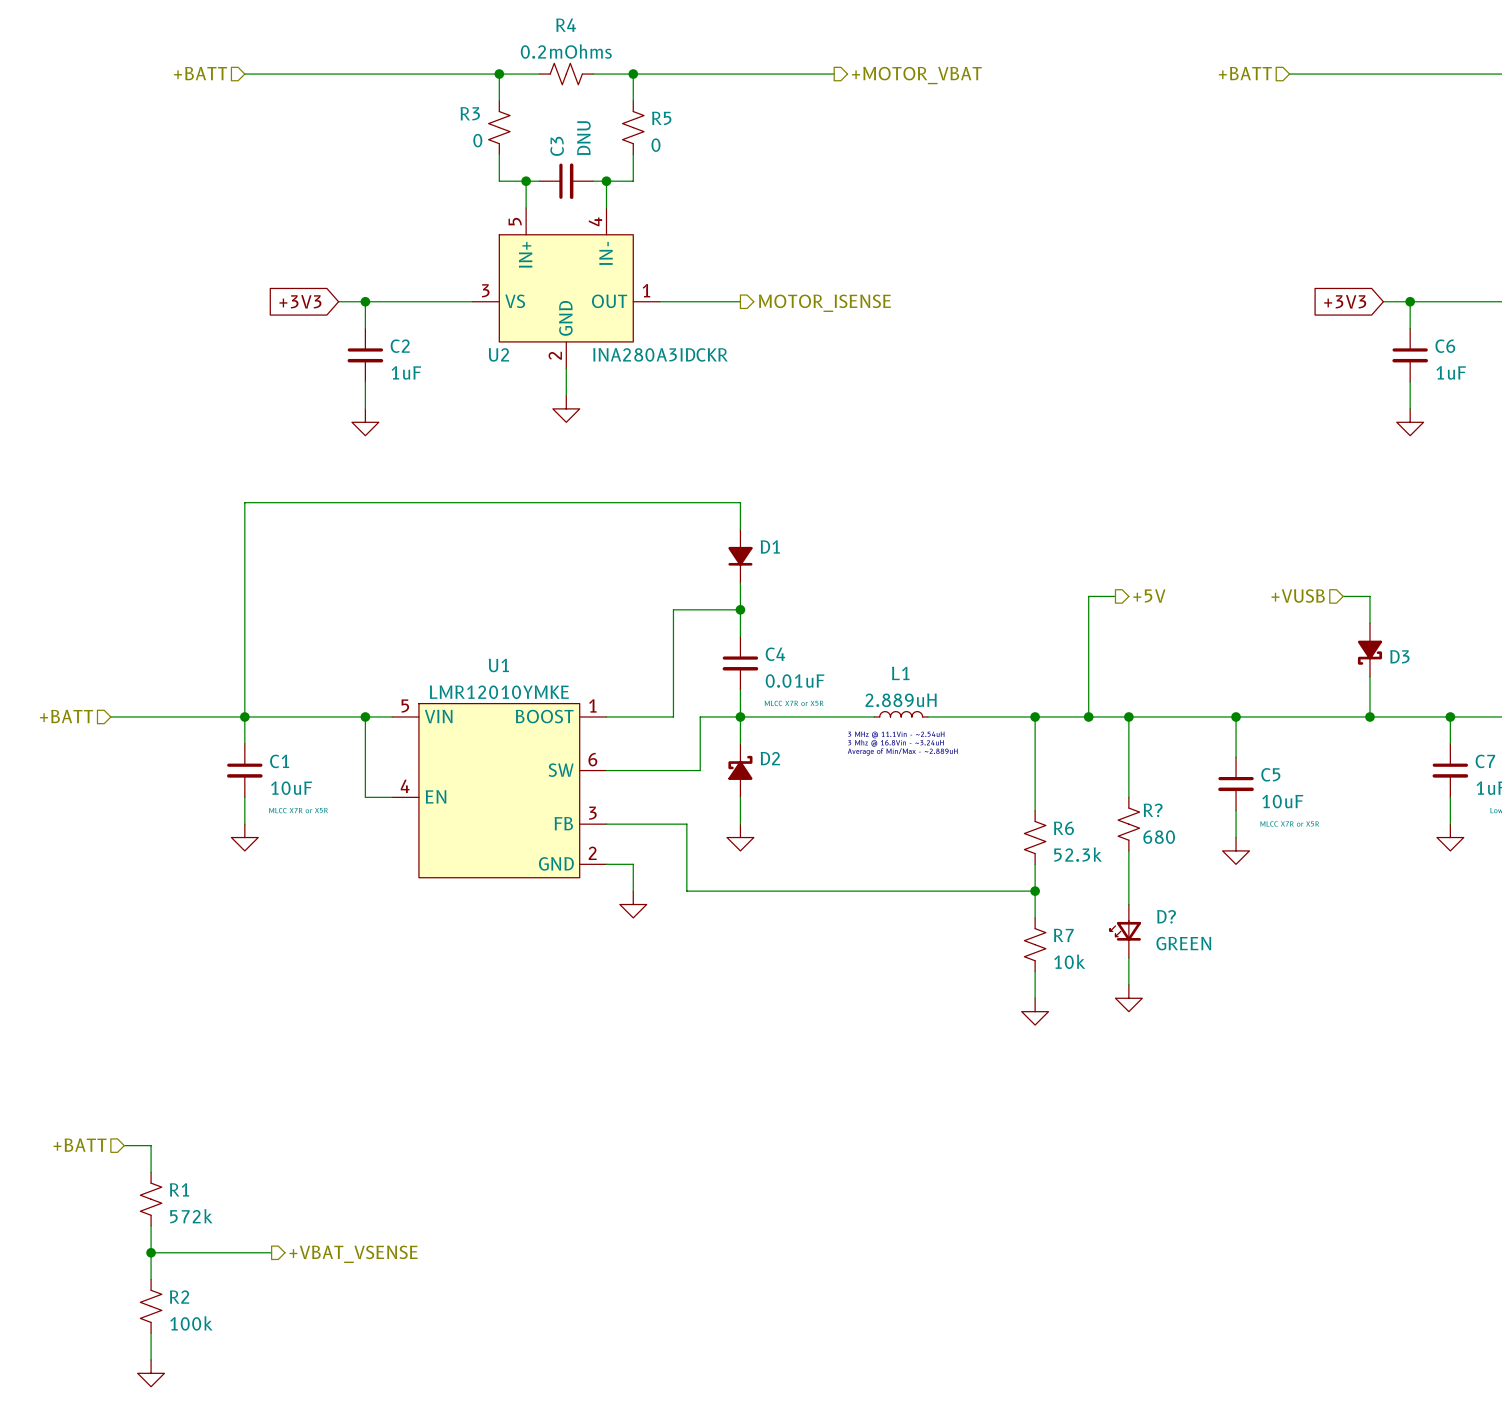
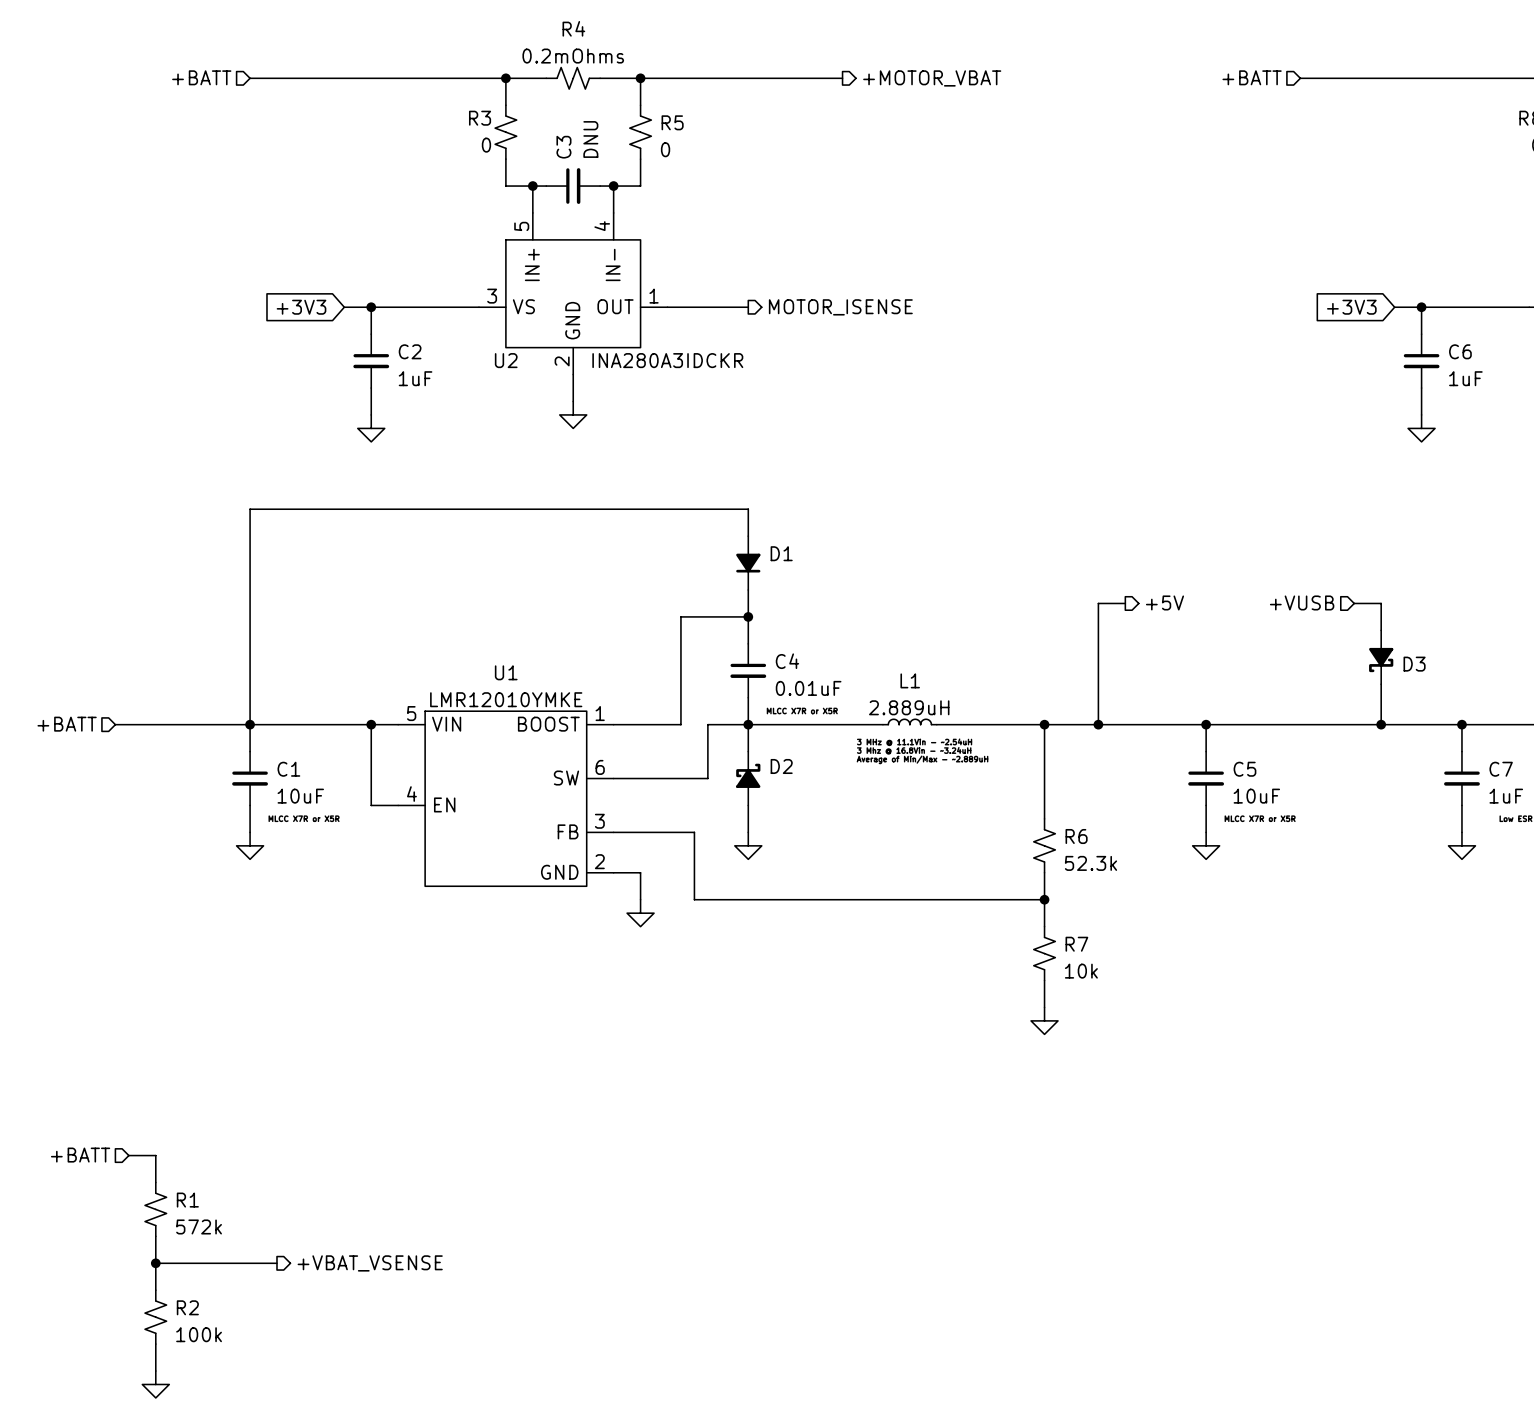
wire: (1128, 716) (1128, 797) -> none
junction: (1128, 716) -> none
junction: none -> (1206, 724)
wire: (1236, 716) (1236, 757) -> none
junction: (1236, 716) -> none
C5 position: (1236, 783) -> (1206, 778)
wire: (1236, 810) (1236, 837) -> (1206, 805) (1206, 832)
R?: 680 (1128, 824) -> none
wire: (1128, 850) (1128, 904) -> none
power symbol position: (1236, 850) -> (1206, 845)
D?: GREEN (1125, 931) -> none
wire: (1128, 958) (1128, 984) -> (1206, 724) (1206, 751)
power symbol: (1128, 998) -> none

